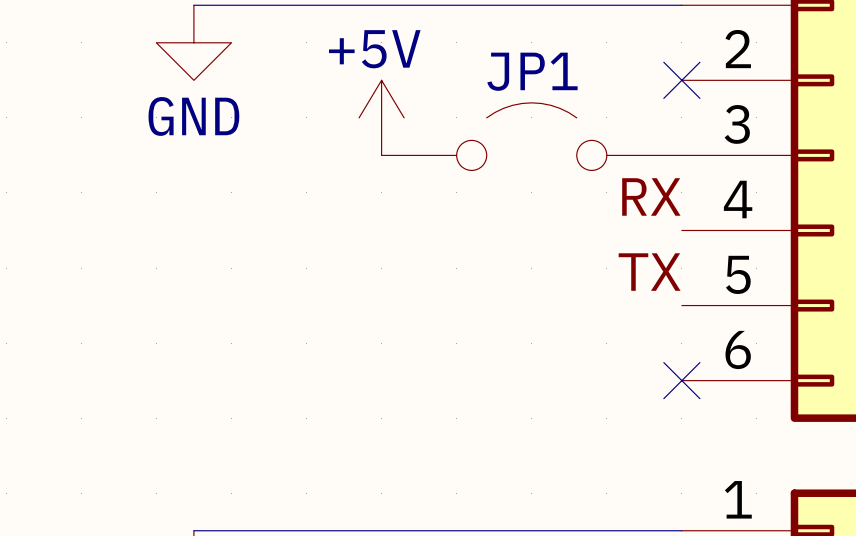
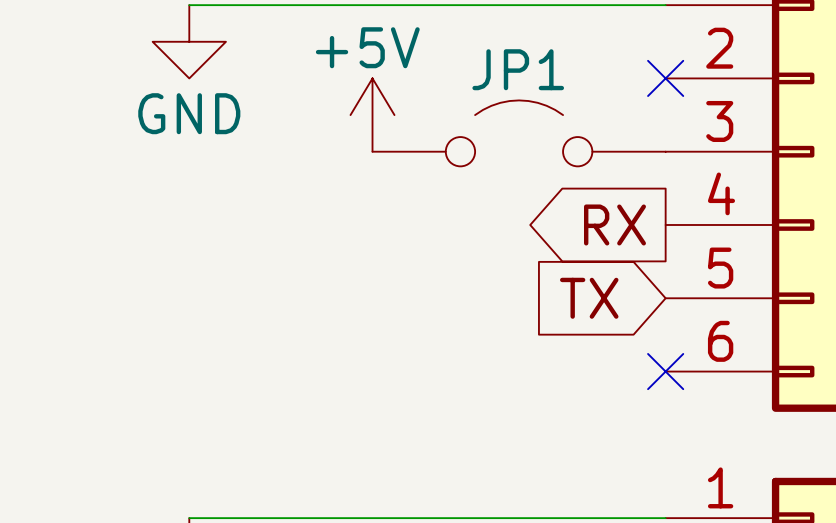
label: RX (651, 196) -> none
global label: none -> RX (614, 224)
label: TX (649, 272) -> none
global label: none -> TX (589, 298)

